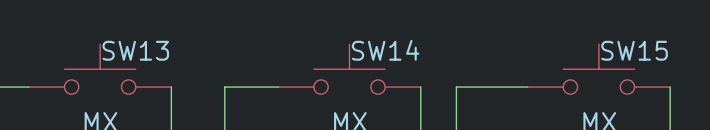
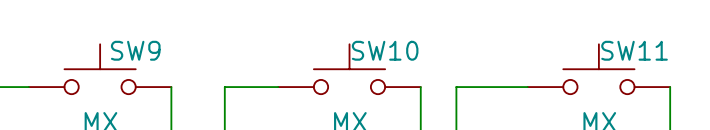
SW13 name: SW13 (135, 50) -> SW9 (135, 50)
SW14 name: SW14 (385, 50) -> SW10 (385, 50)
SW15 name: SW15 (634, 50) -> SW11 (634, 50)

